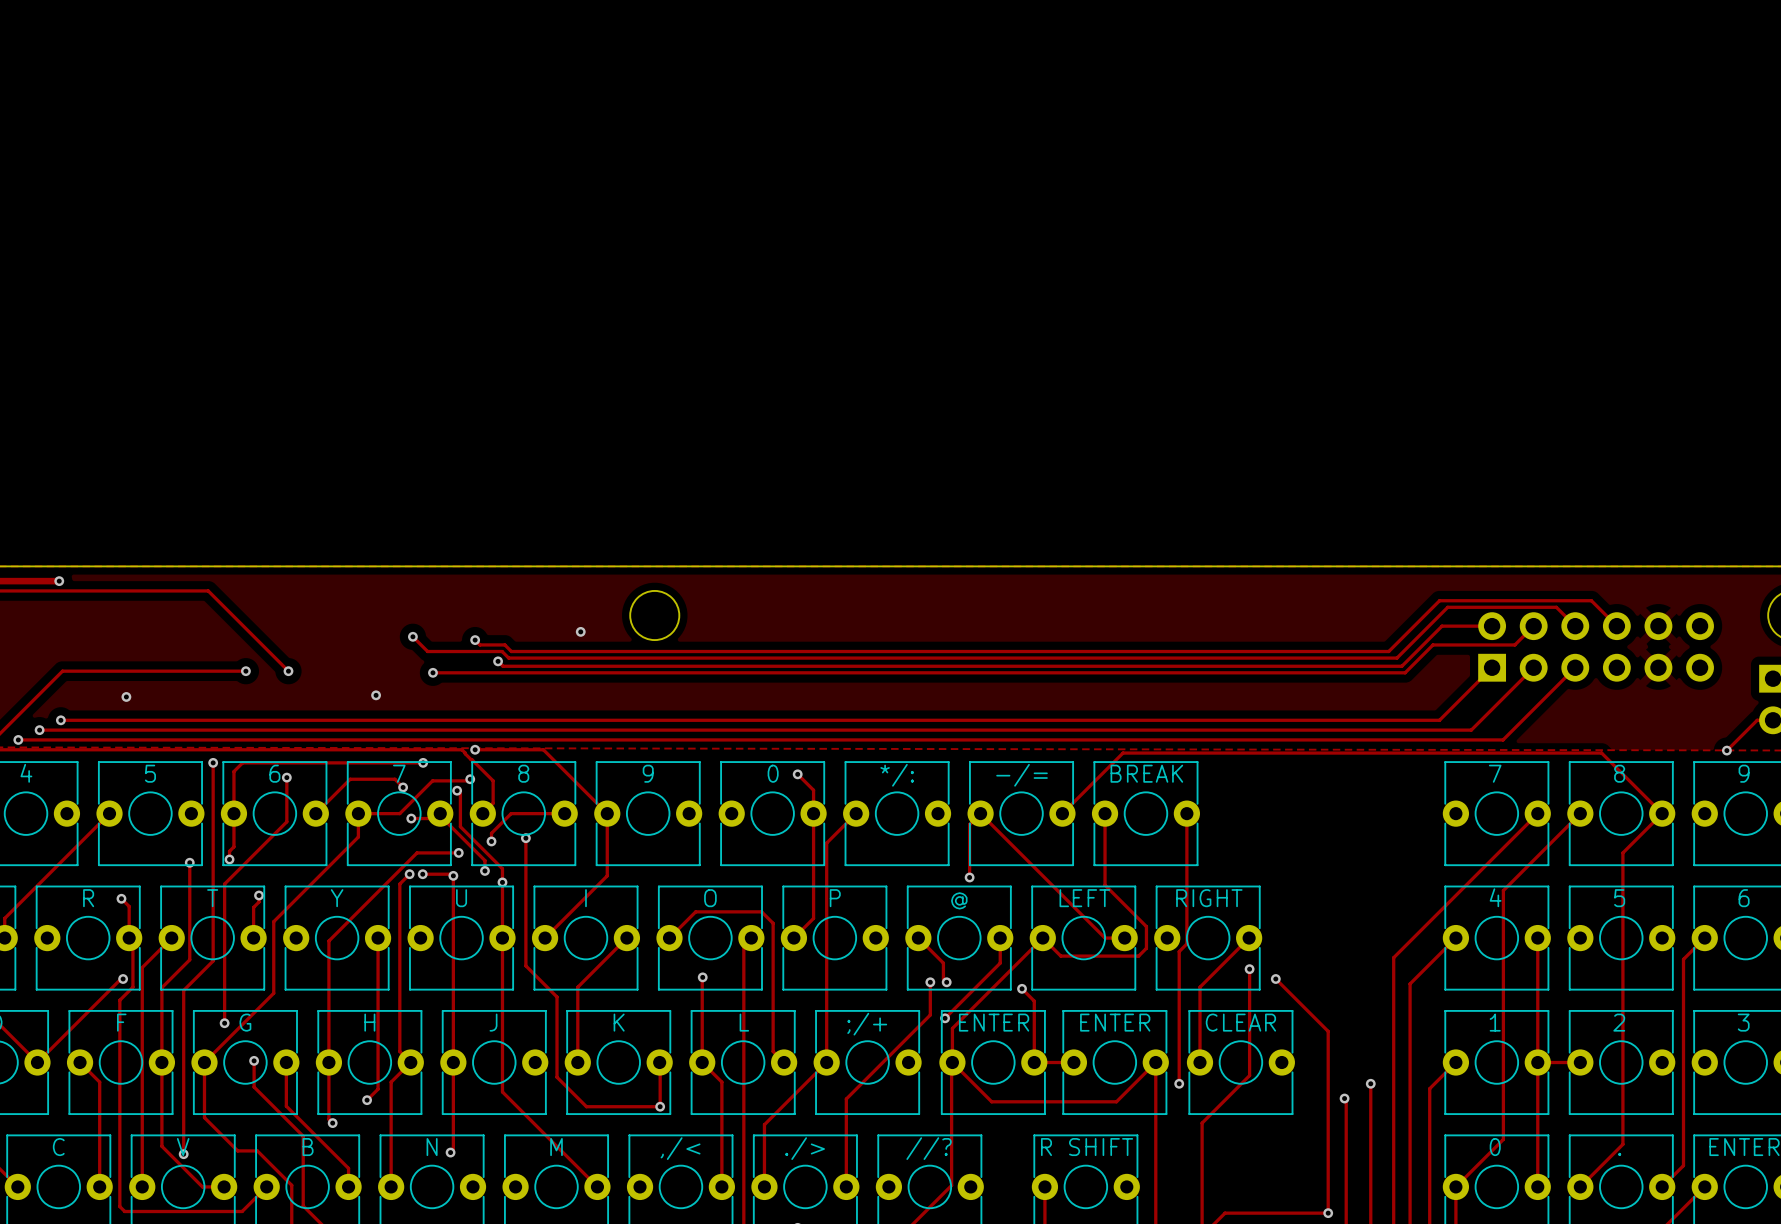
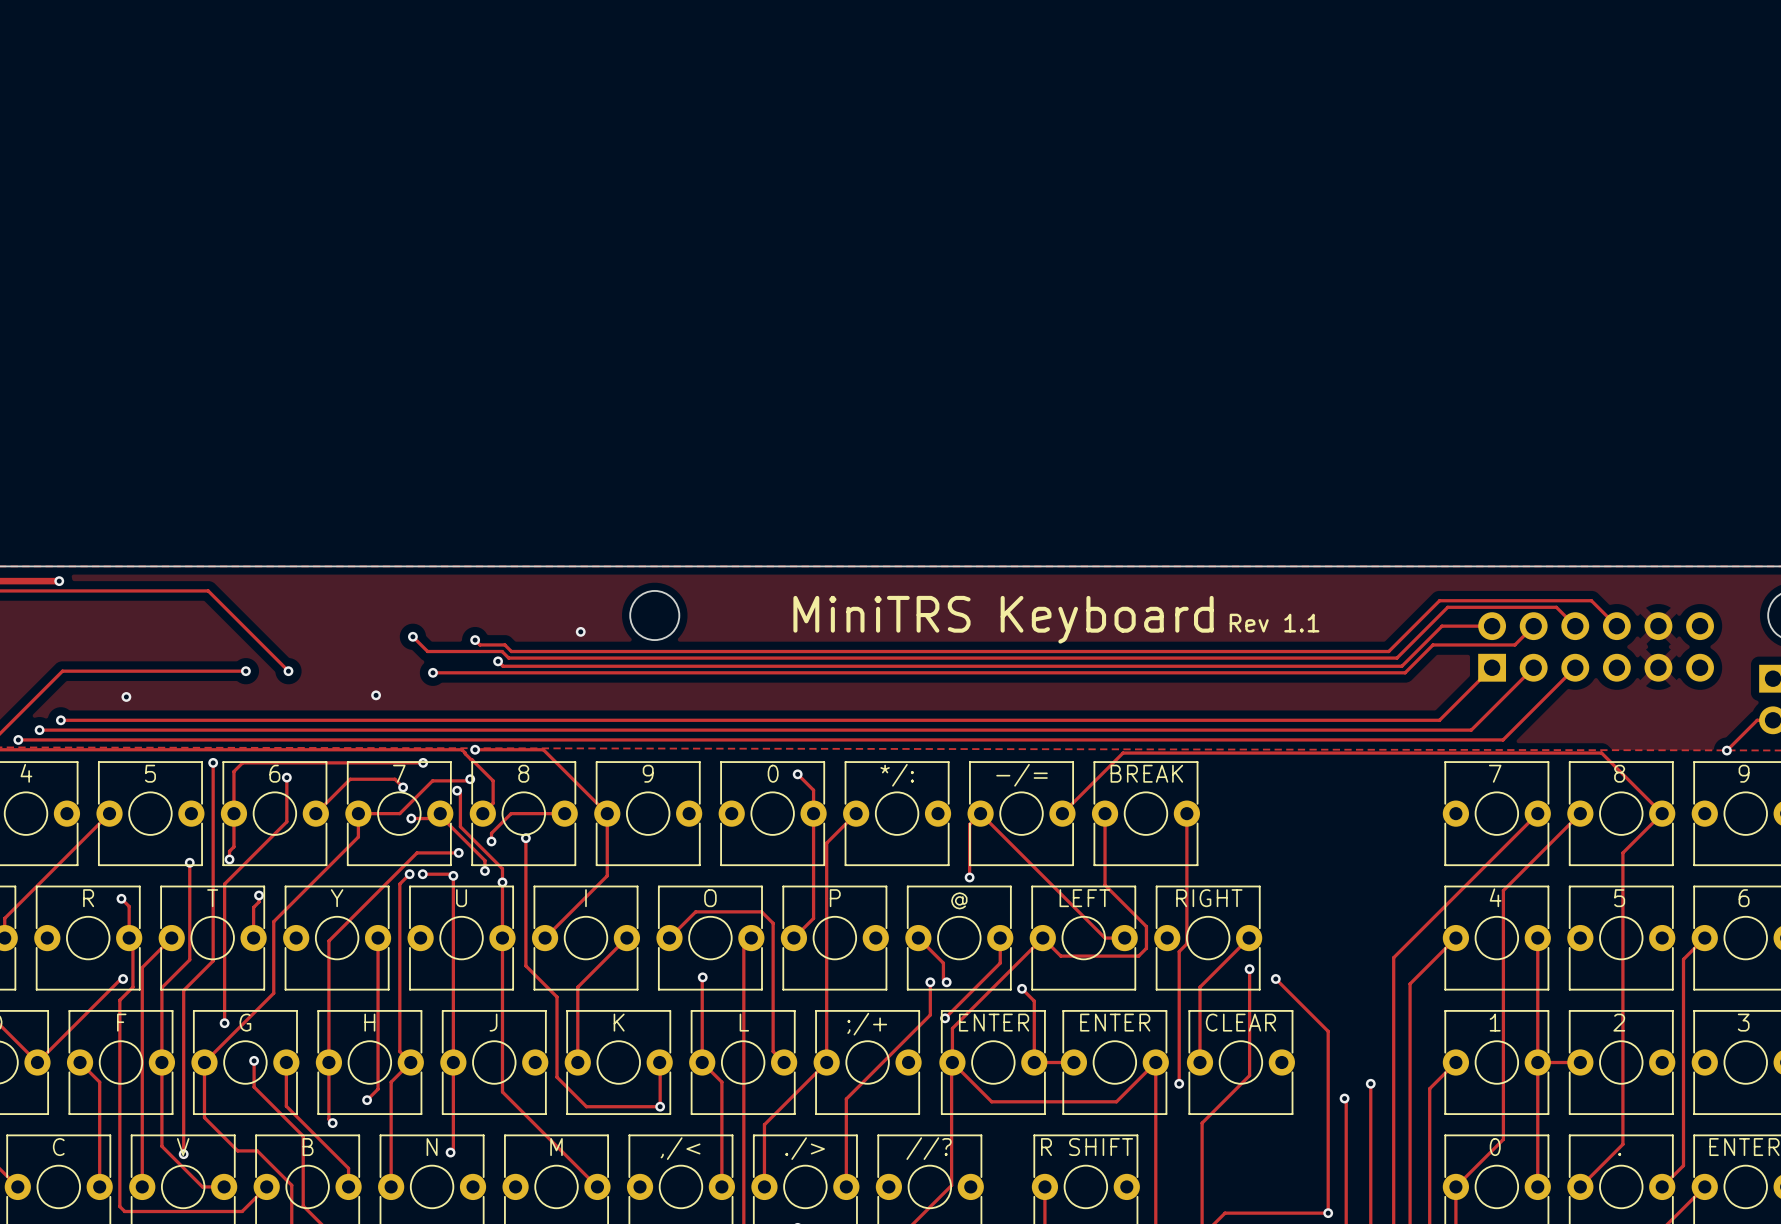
text: none -> MiniTRS (881, 614)
text: none -> Keyboard (1107, 619)
text: none -> Rev 1.1 (1274, 623)

